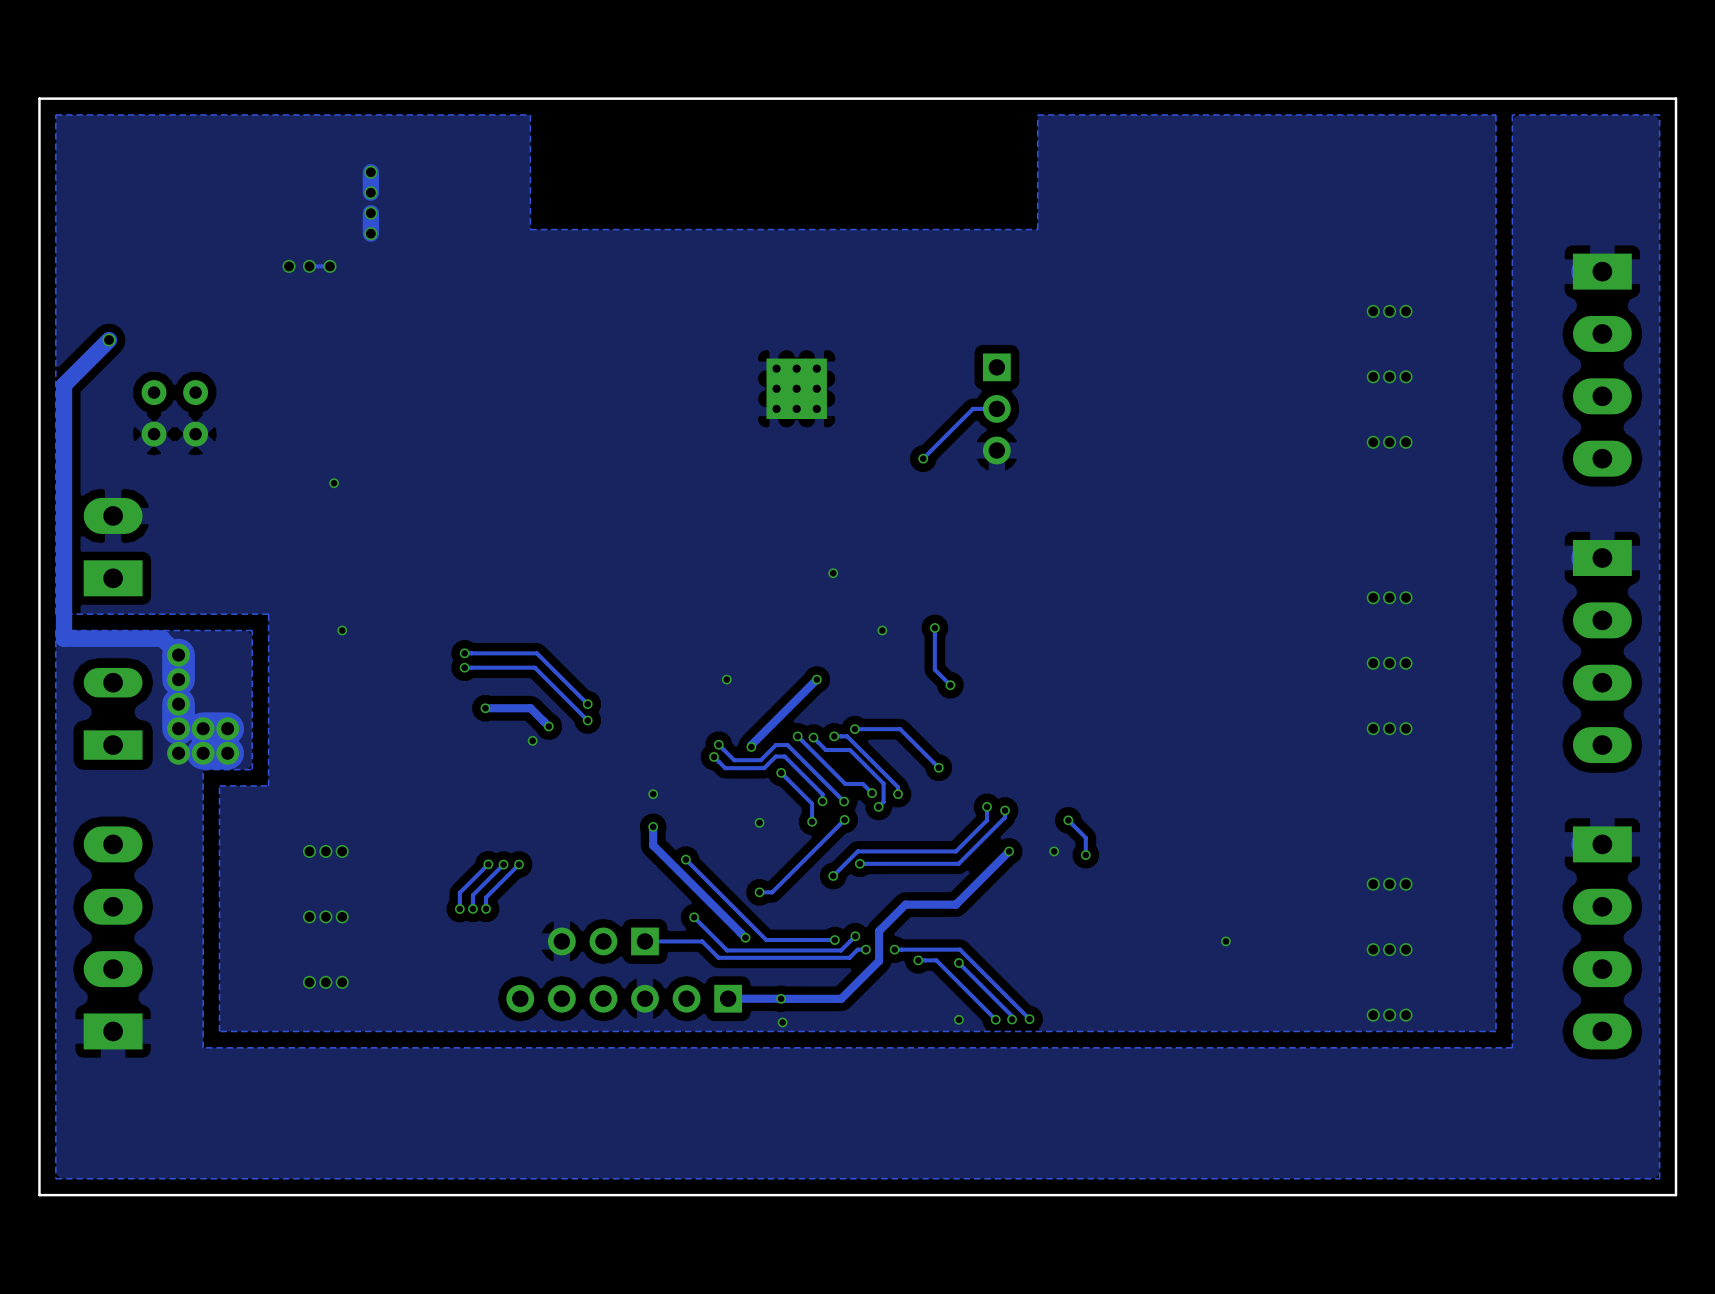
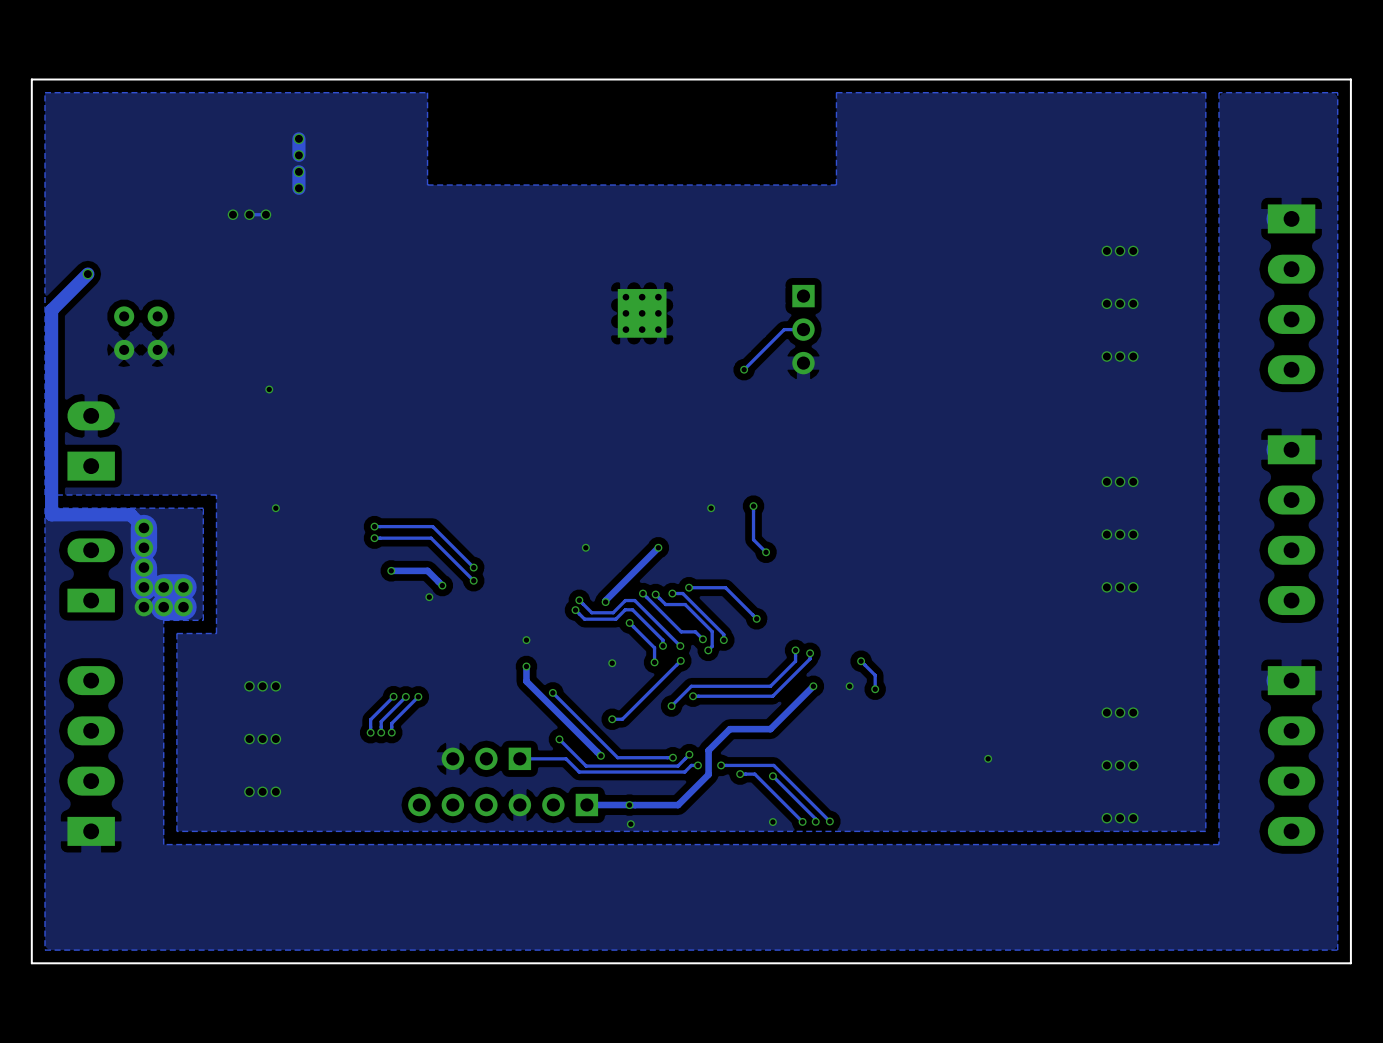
via: (833, 573) -> none

